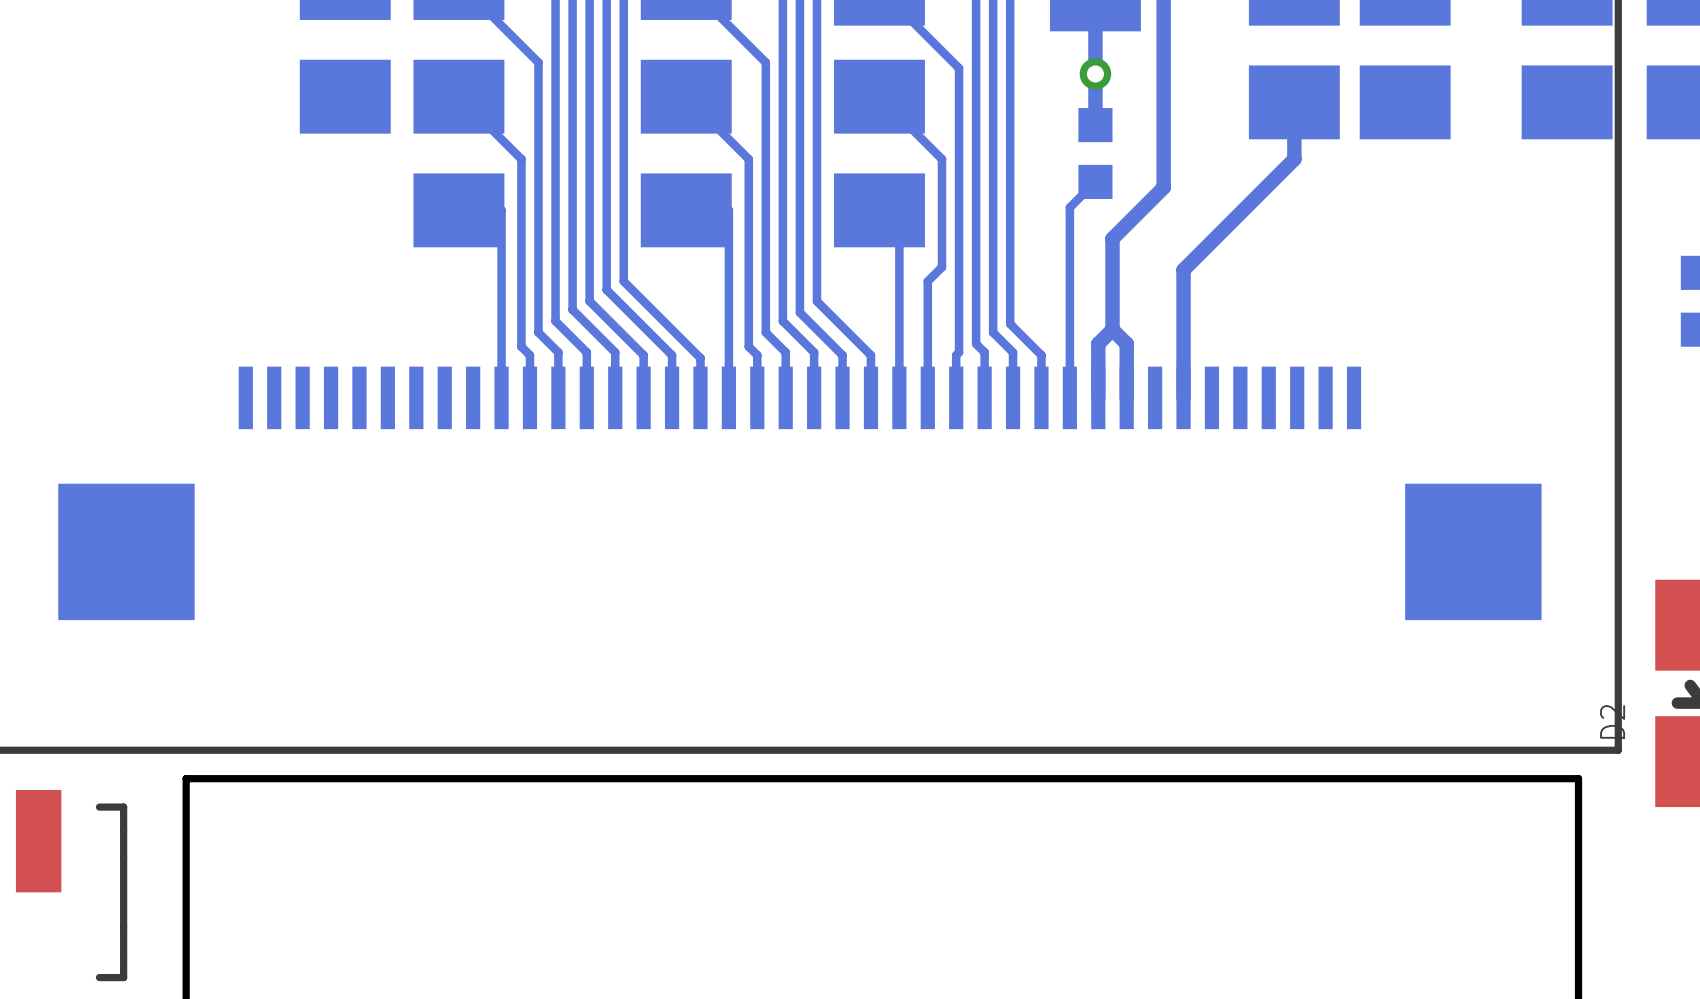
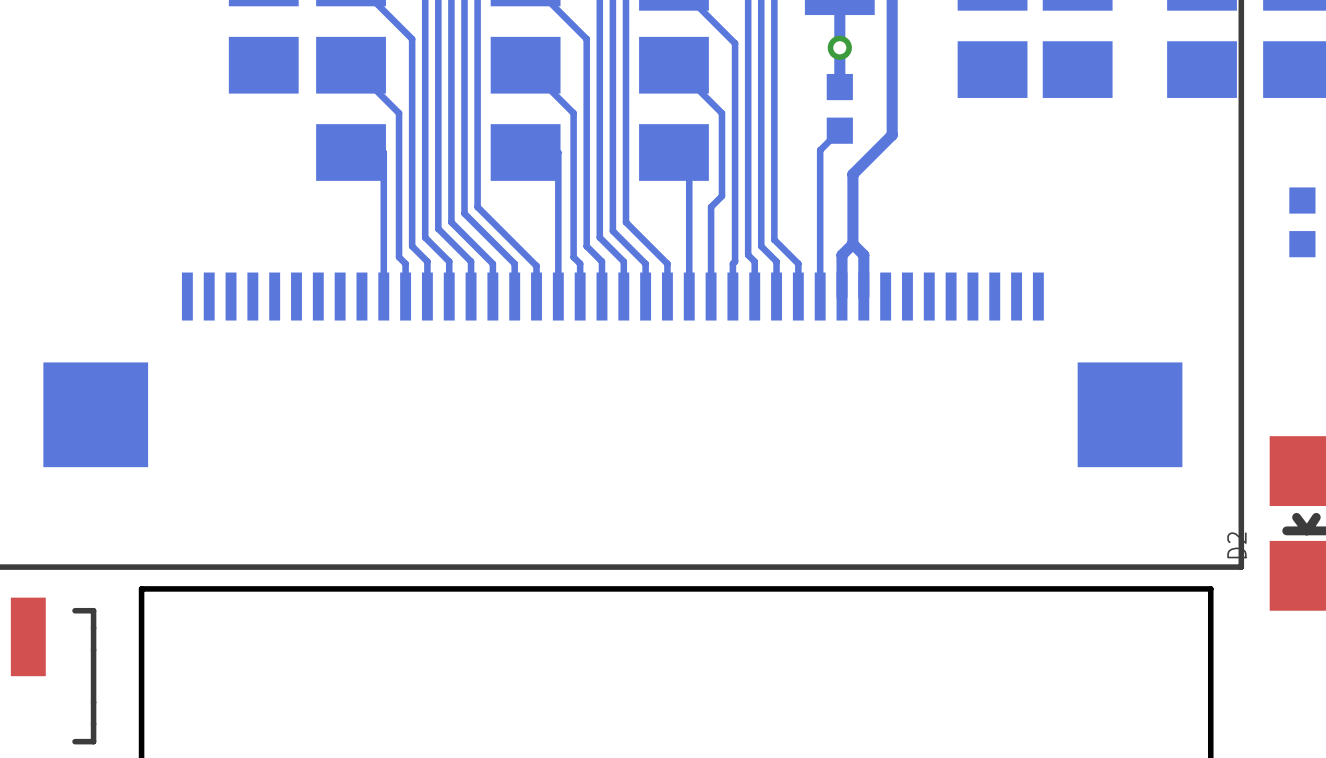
bottom track: (1294, 108) (1294, 159) (1183, 270) (1183, 397) -> none

